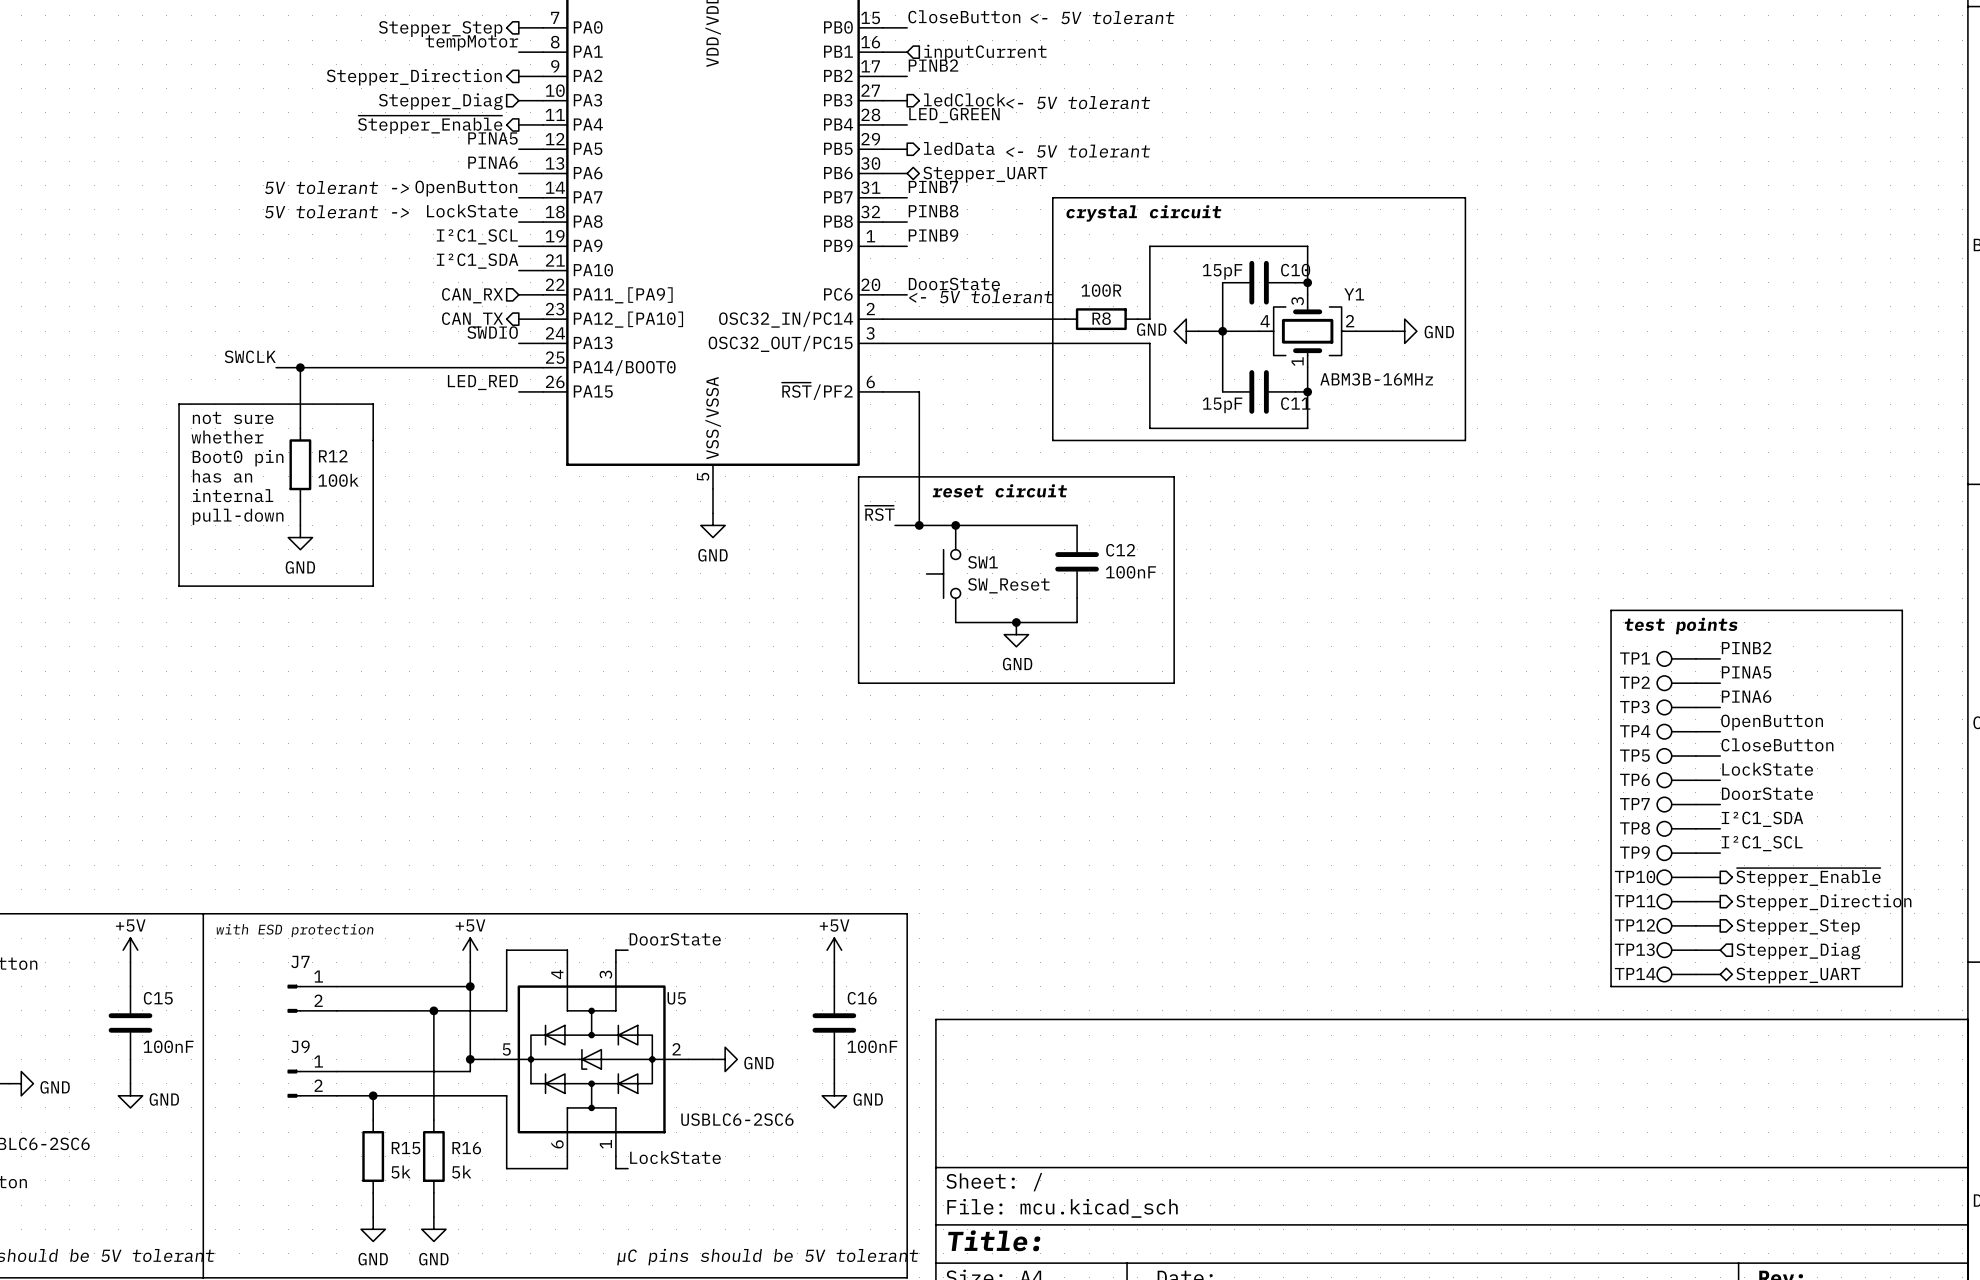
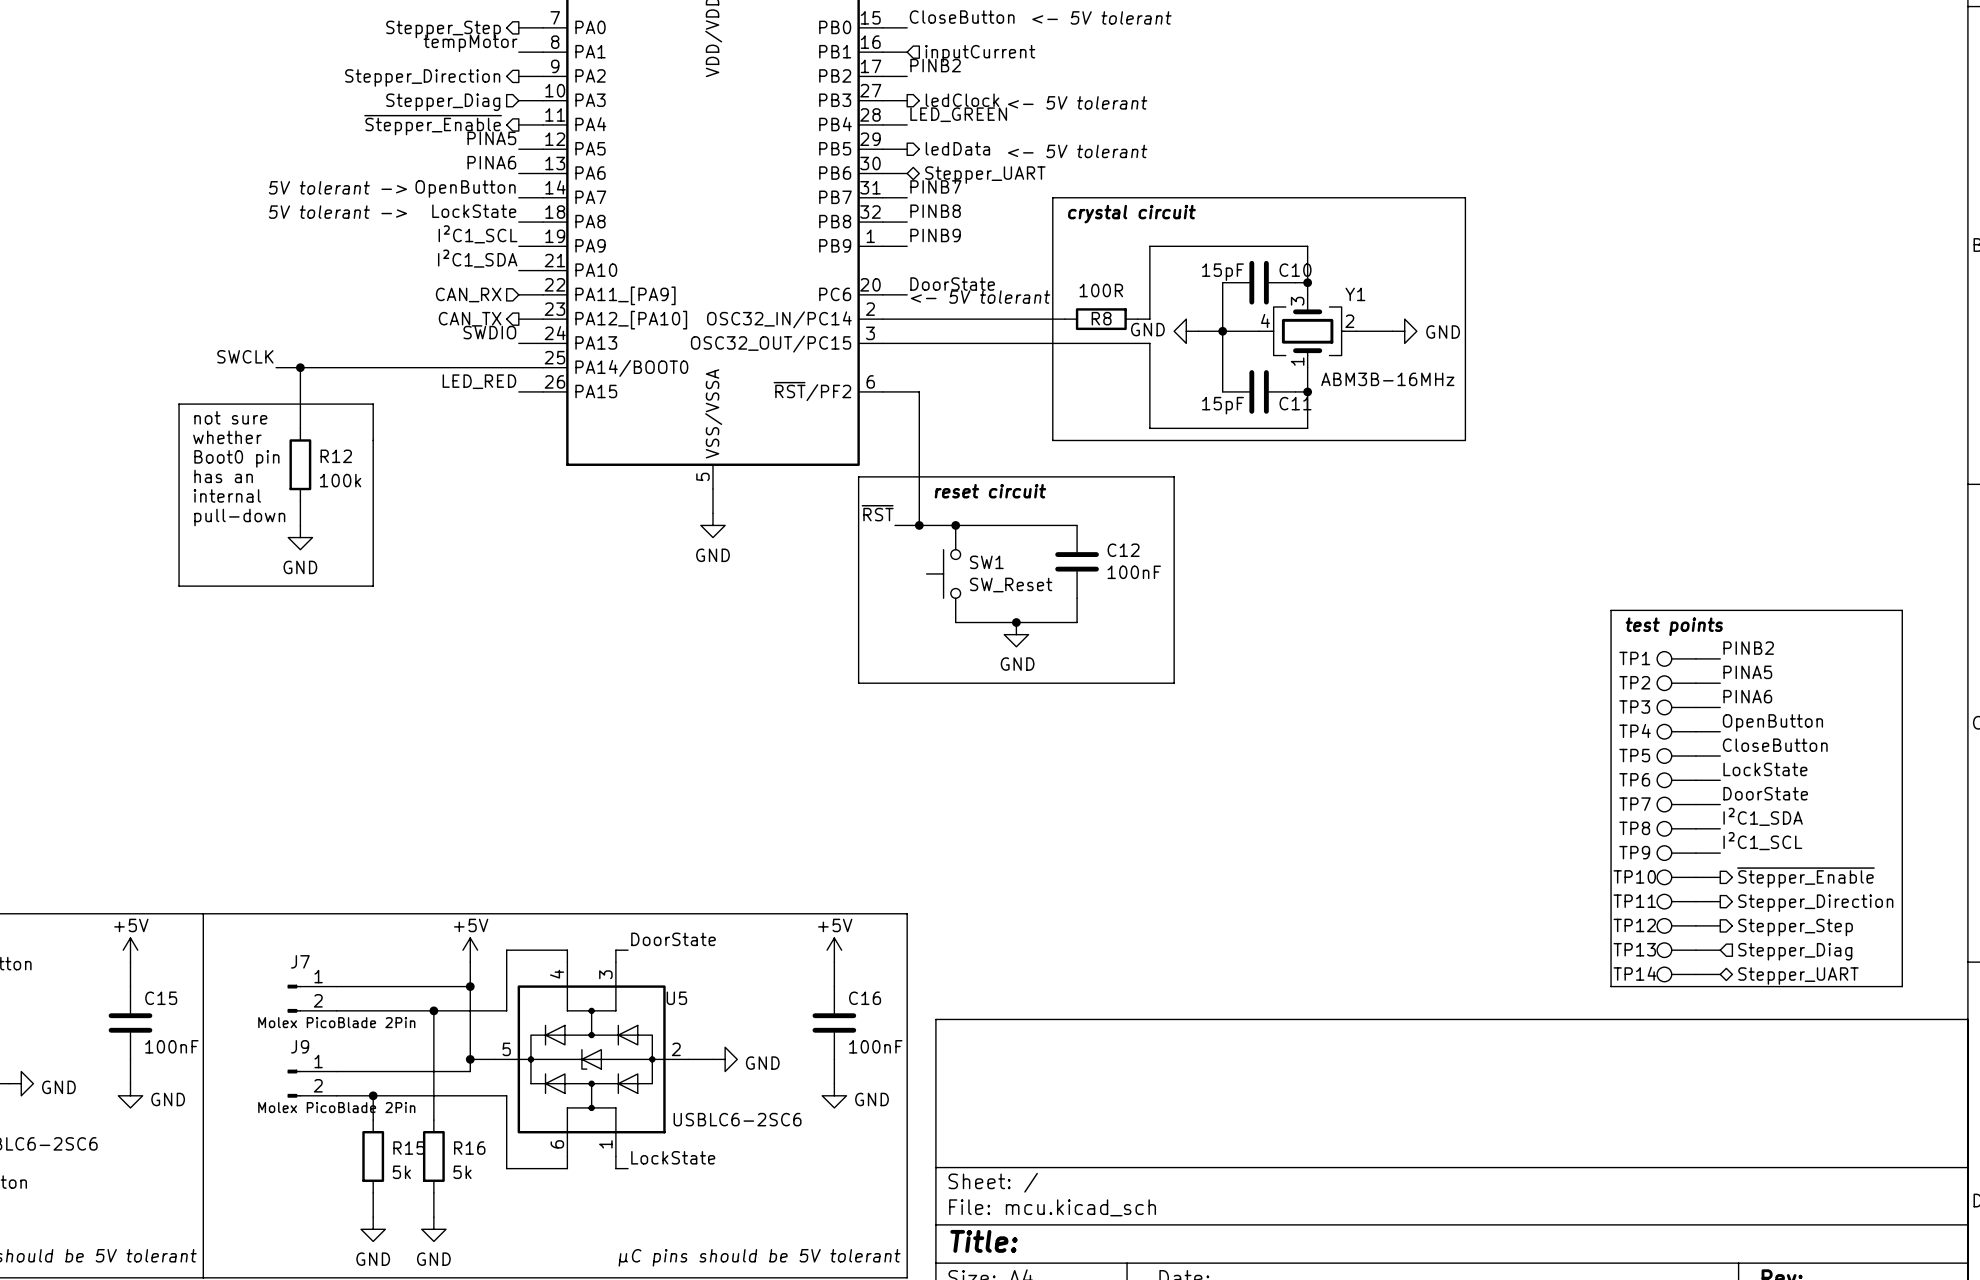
text: with ESD protection (295, 930) -> none
J7 value: none -> Molex PicoBlade 2Pin (336, 1022)
J9 value: none -> Molex PicoBlade 2Pin (336, 1107)

